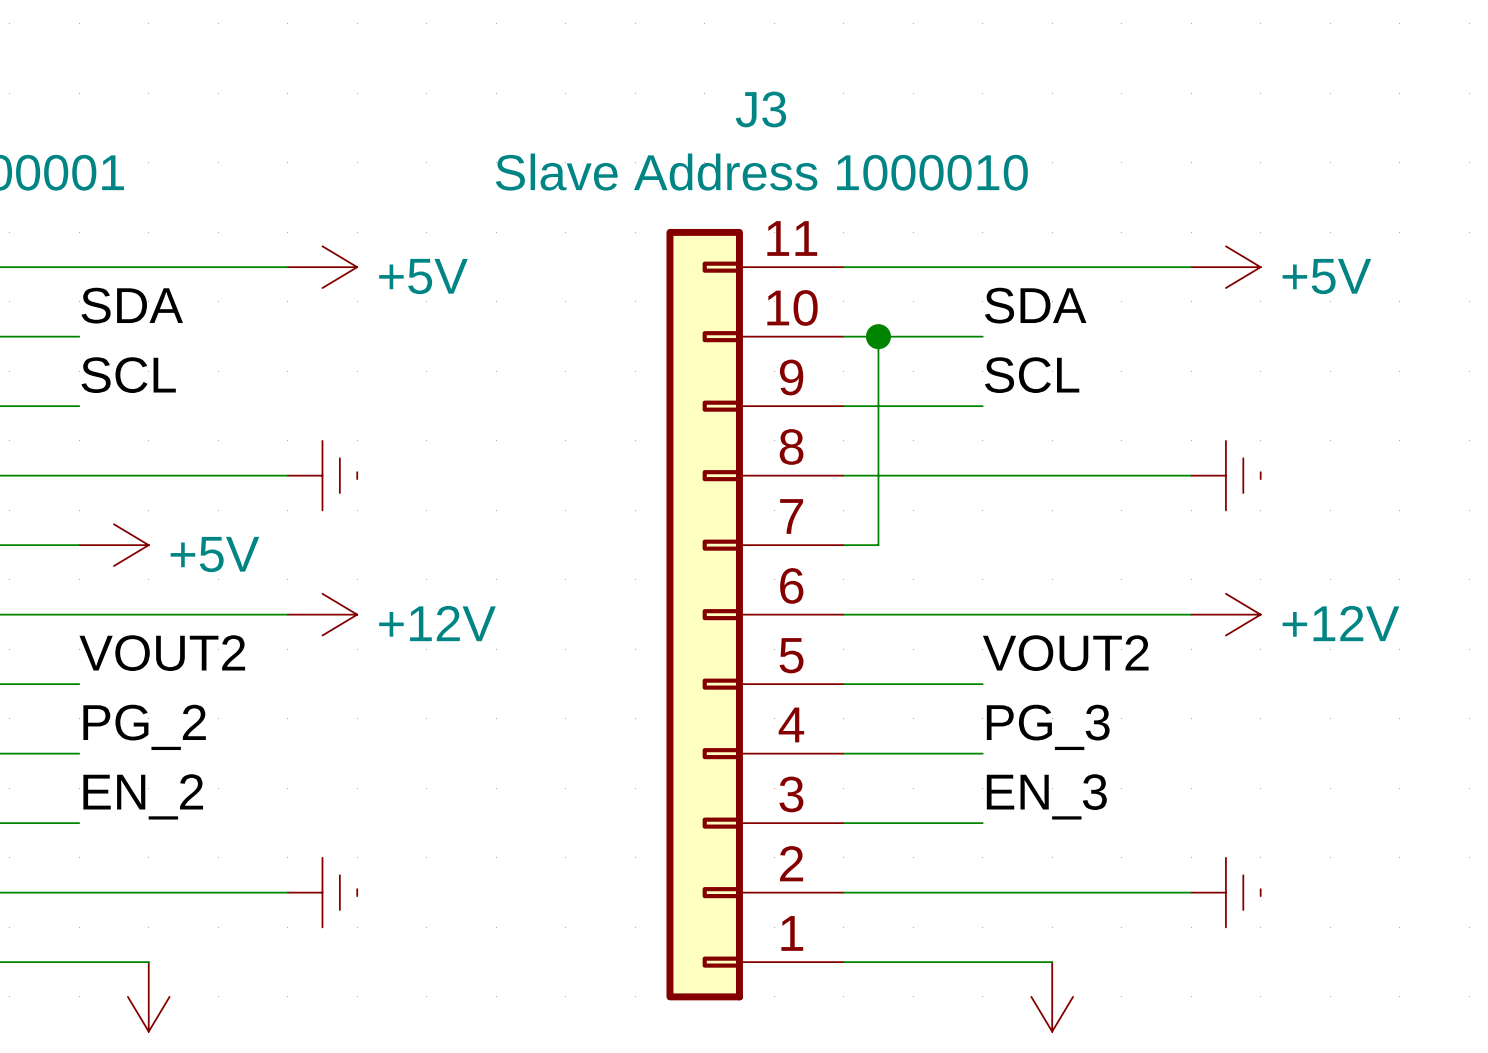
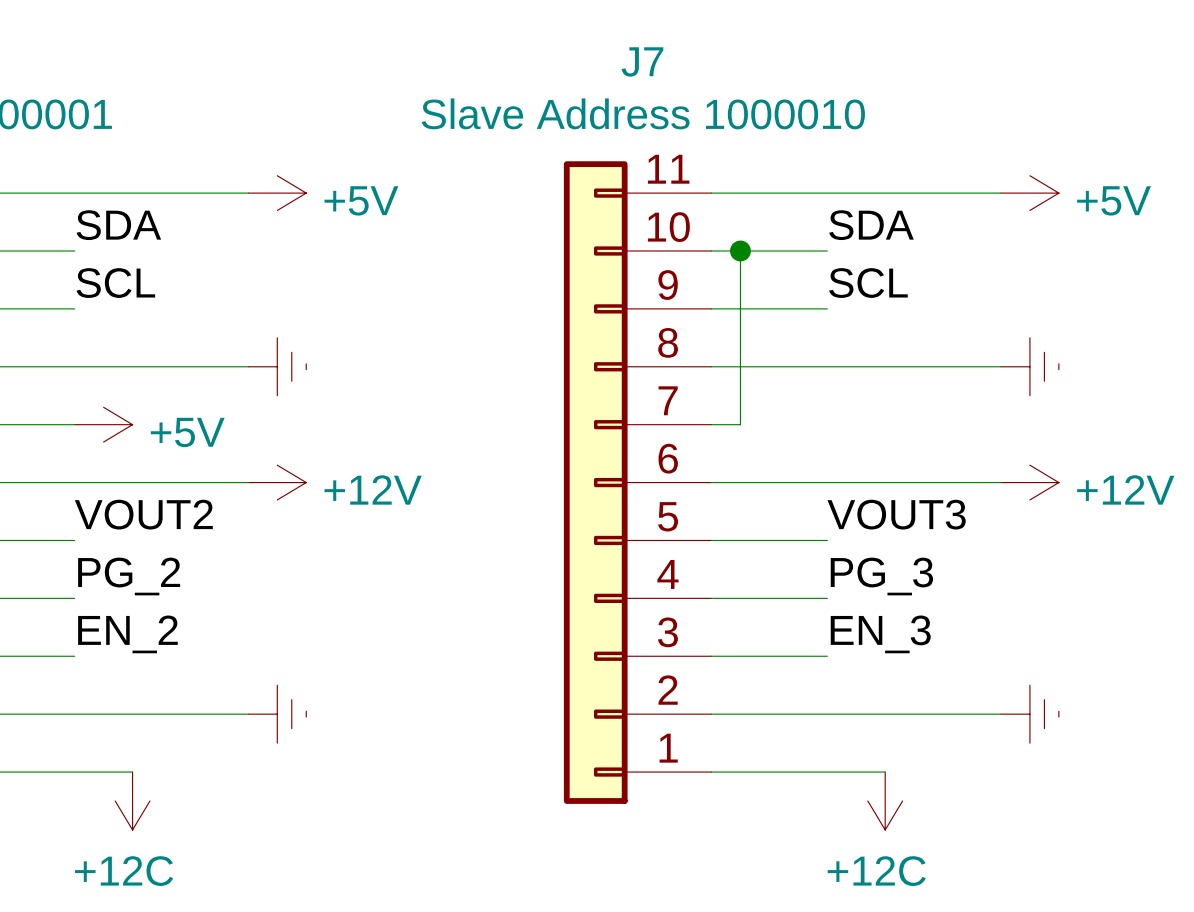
J3 name: J3 (760, 109) -> J7 (642, 61)
label: VOUT2 (1065, 653) -> VOUT3 (896, 514)

